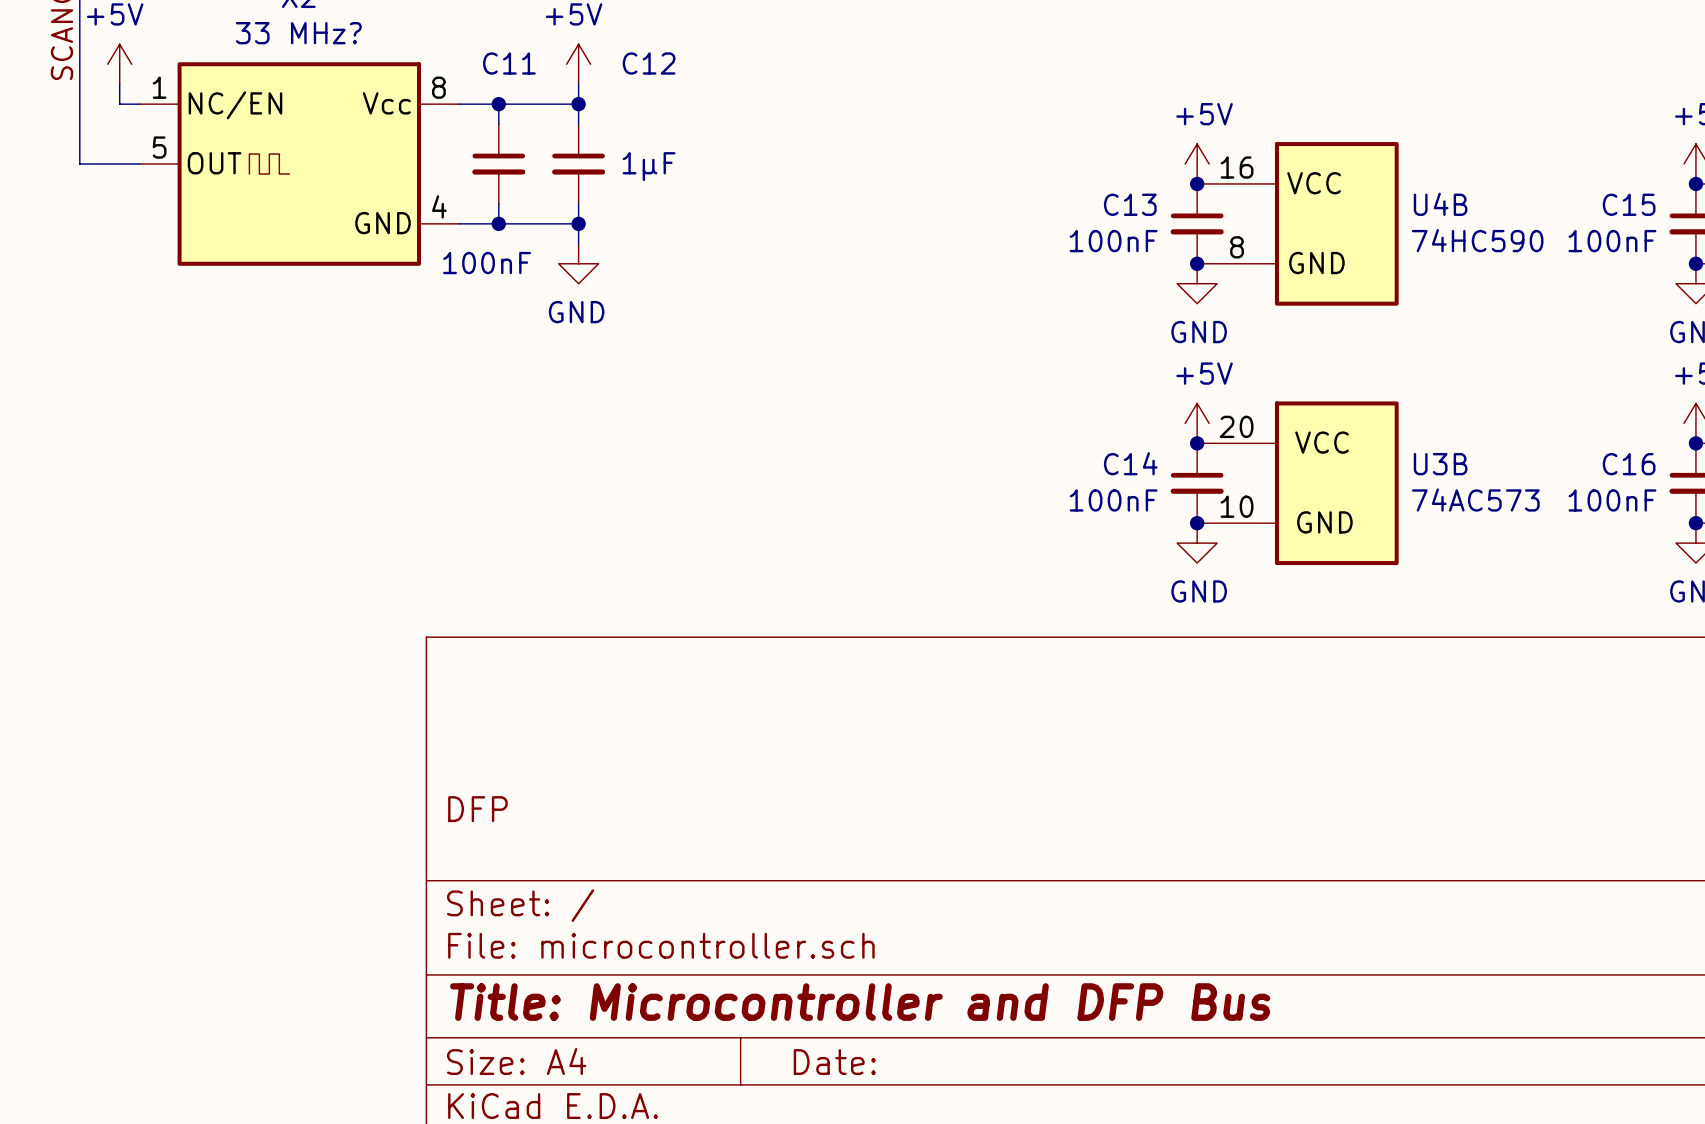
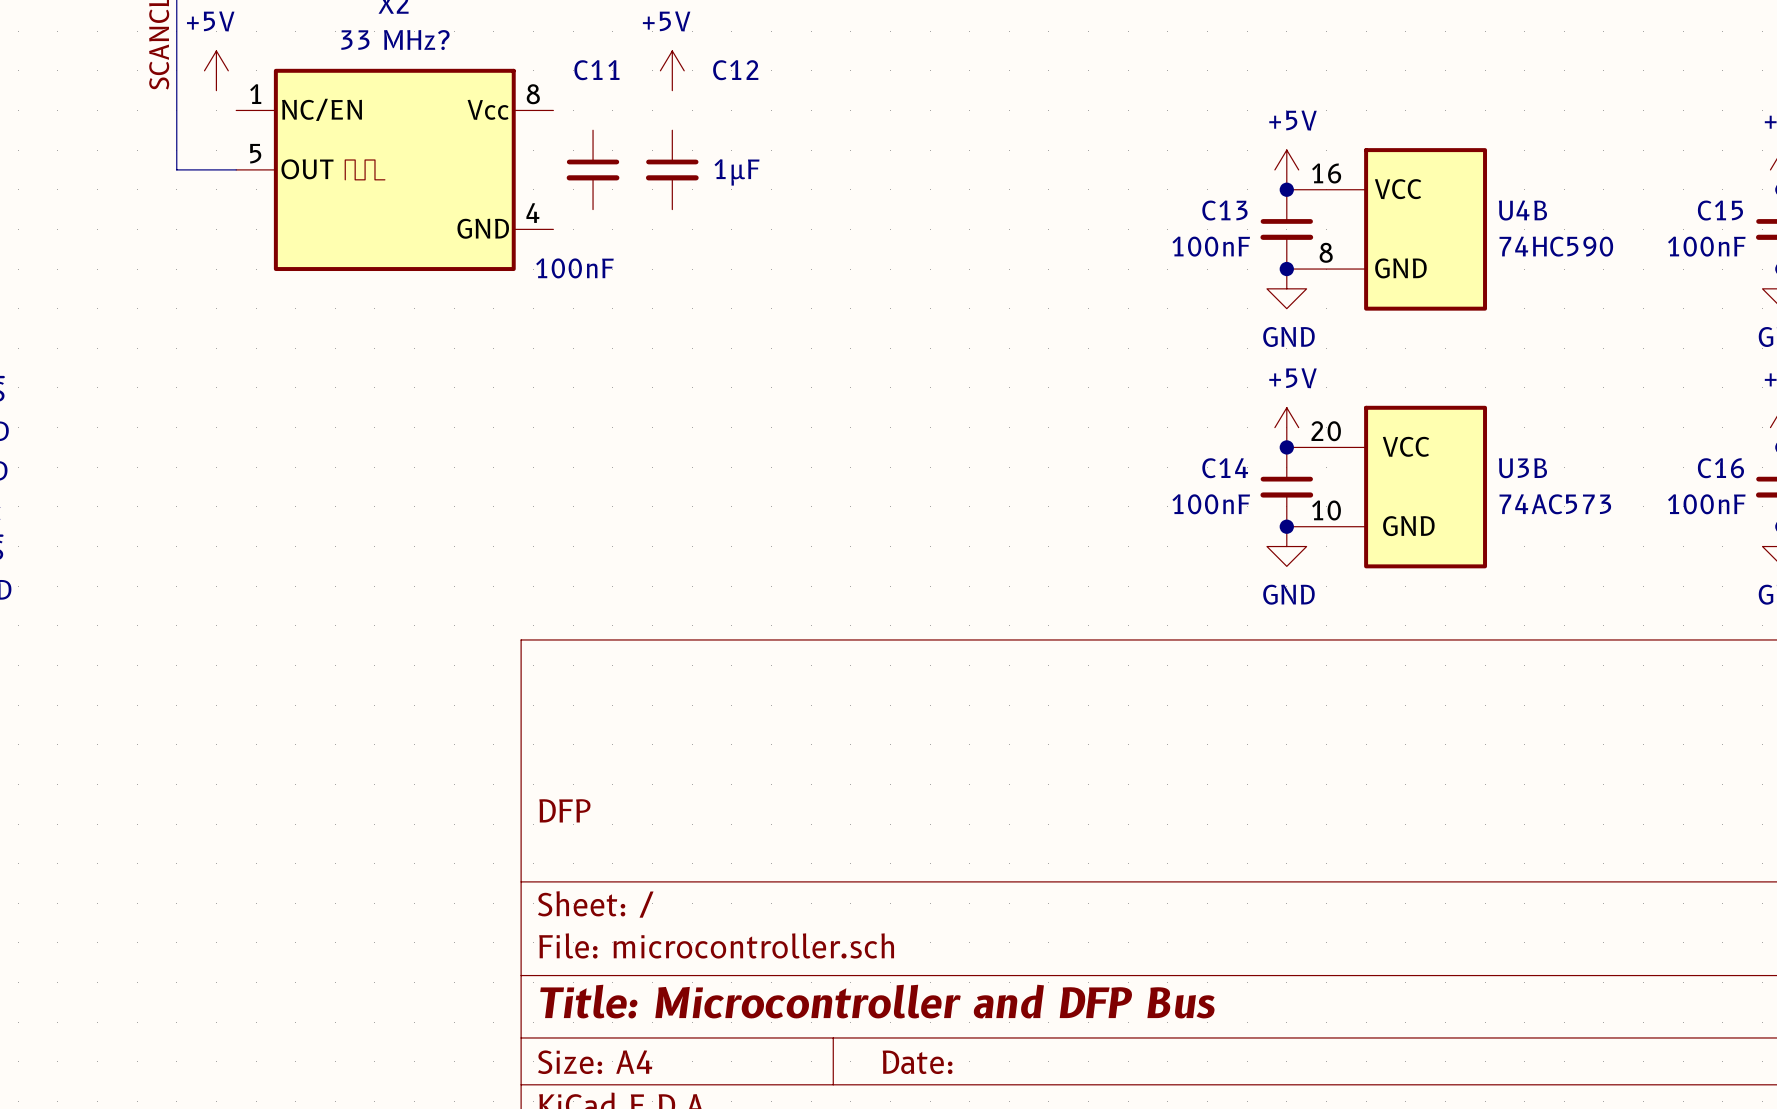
wire: (119, 84) (119, 104) (139, 104) -> none
wire: (578, 84) (578, 124) -> none
wire: (458, 104) (578, 104) -> none
wire: (498, 104) (498, 124) -> none
junction: (498, 104) -> none
junction: (578, 104) -> none
wire: (498, 203) (498, 223) -> none
wire: (578, 203) (578, 243) -> none
wire: (458, 223) (578, 223) -> none
junction: (498, 223) -> none
junction: (578, 223) -> none
power symbol: GND (578, 263) -> none

